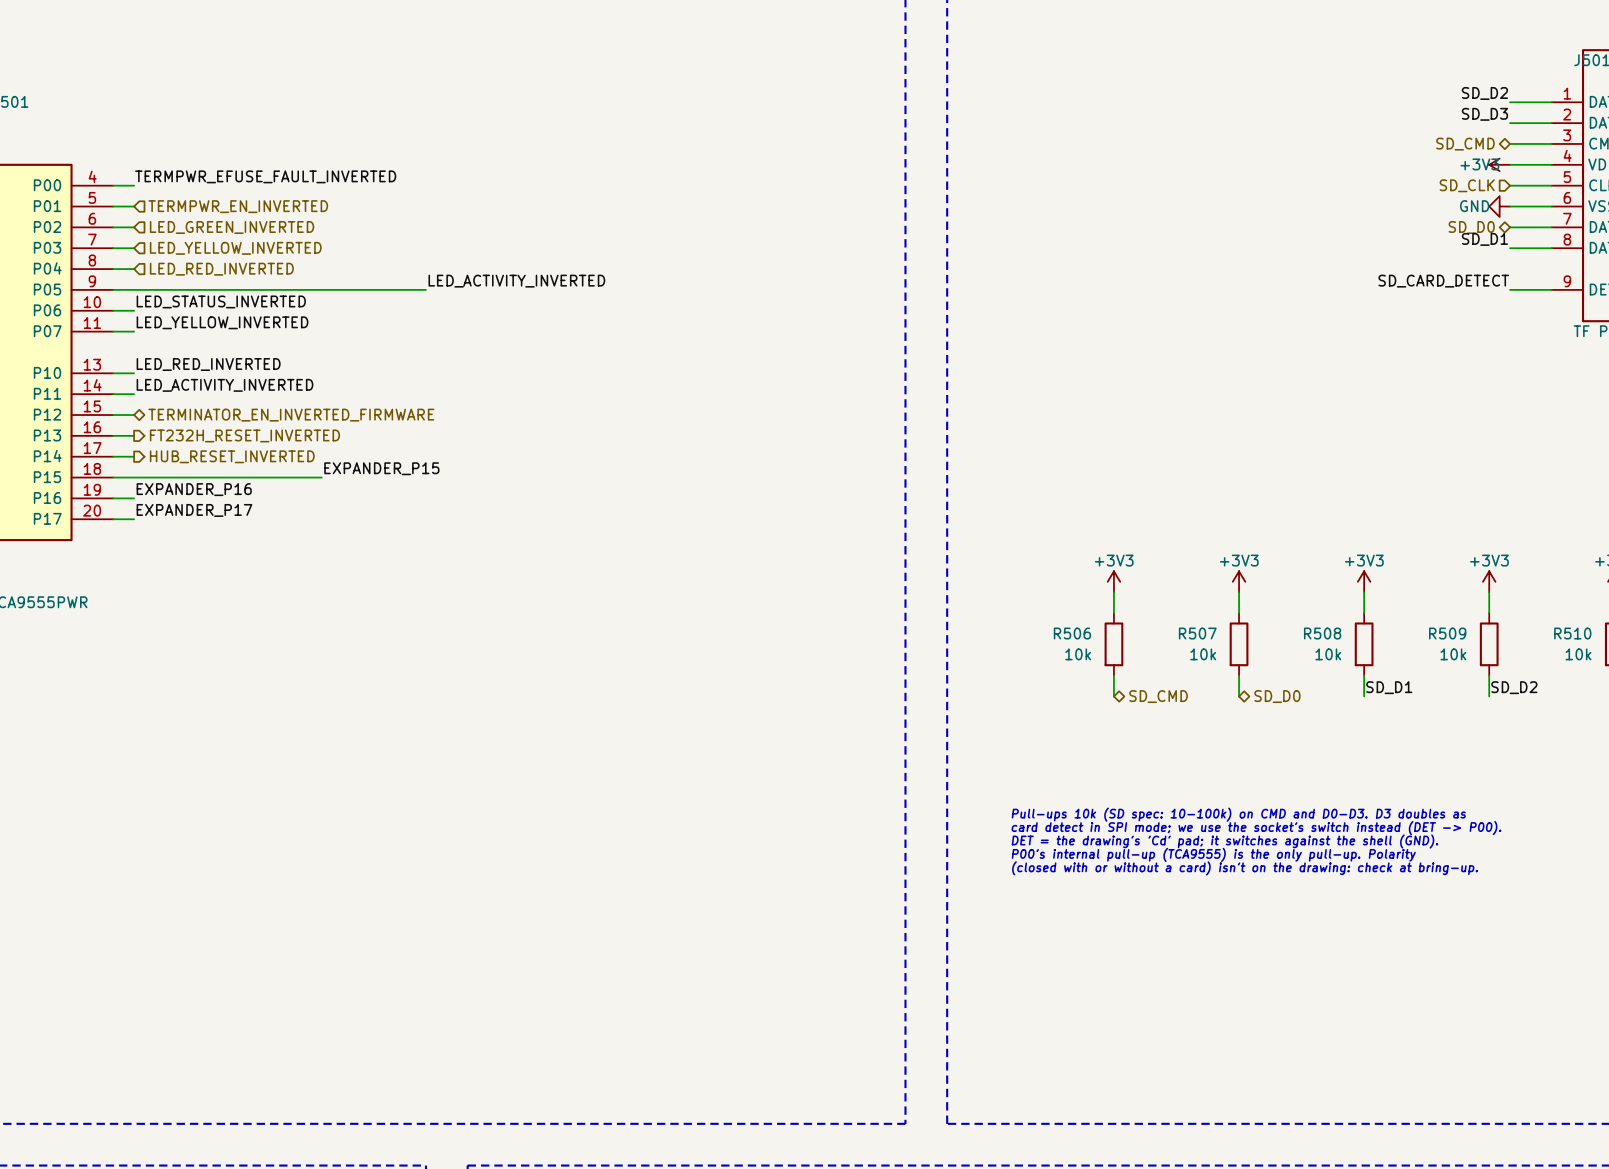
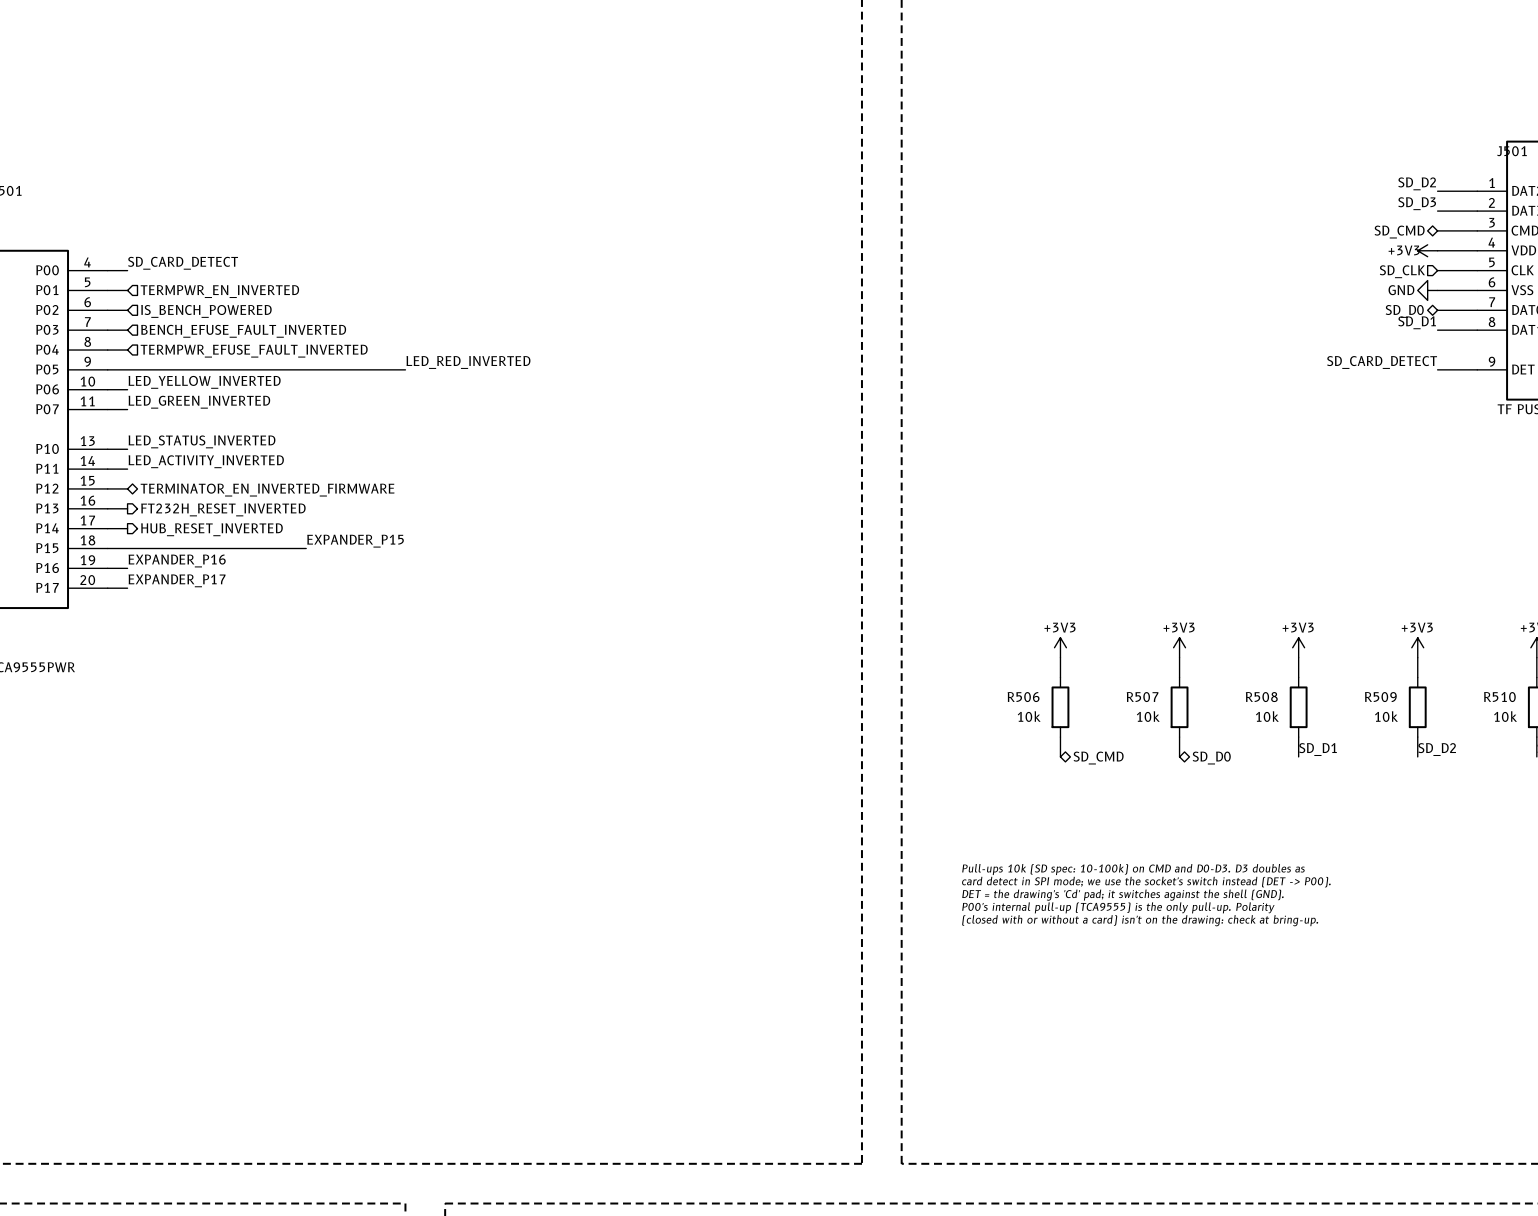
label: TERMPWR_EFUSE_FAULT_INVERTED (265, 176) -> SD_CARD_DETECT (183, 263)
hierarchical label: LED_GREEN_INVERTED (232, 227) -> IS_BENCH_POWERED (206, 311)
hierarchical label: LED_YELLOW_INVERTED (235, 248) -> BENCH_EFUSE_FAULT_INVERTED (243, 331)
hierarchical label: LED_RED_INVERTED (221, 269) -> TERMPWR_EFUSE_FAULT_INVERTED (254, 351)
label: LED_ACTIVITY_INVERTED (516, 281) -> LED_RED_INVERTED (468, 362)
label: LED_STATUS_INVERTED (221, 301) -> LED_YELLOW_INVERTED (204, 382)
label: LED_YELLOW_INVERTED (222, 322) -> LED_GREEN_INVERTED (199, 402)
label: LED_RED_INVERTED (208, 364) -> LED_STATUS_INVERTED (202, 441)

